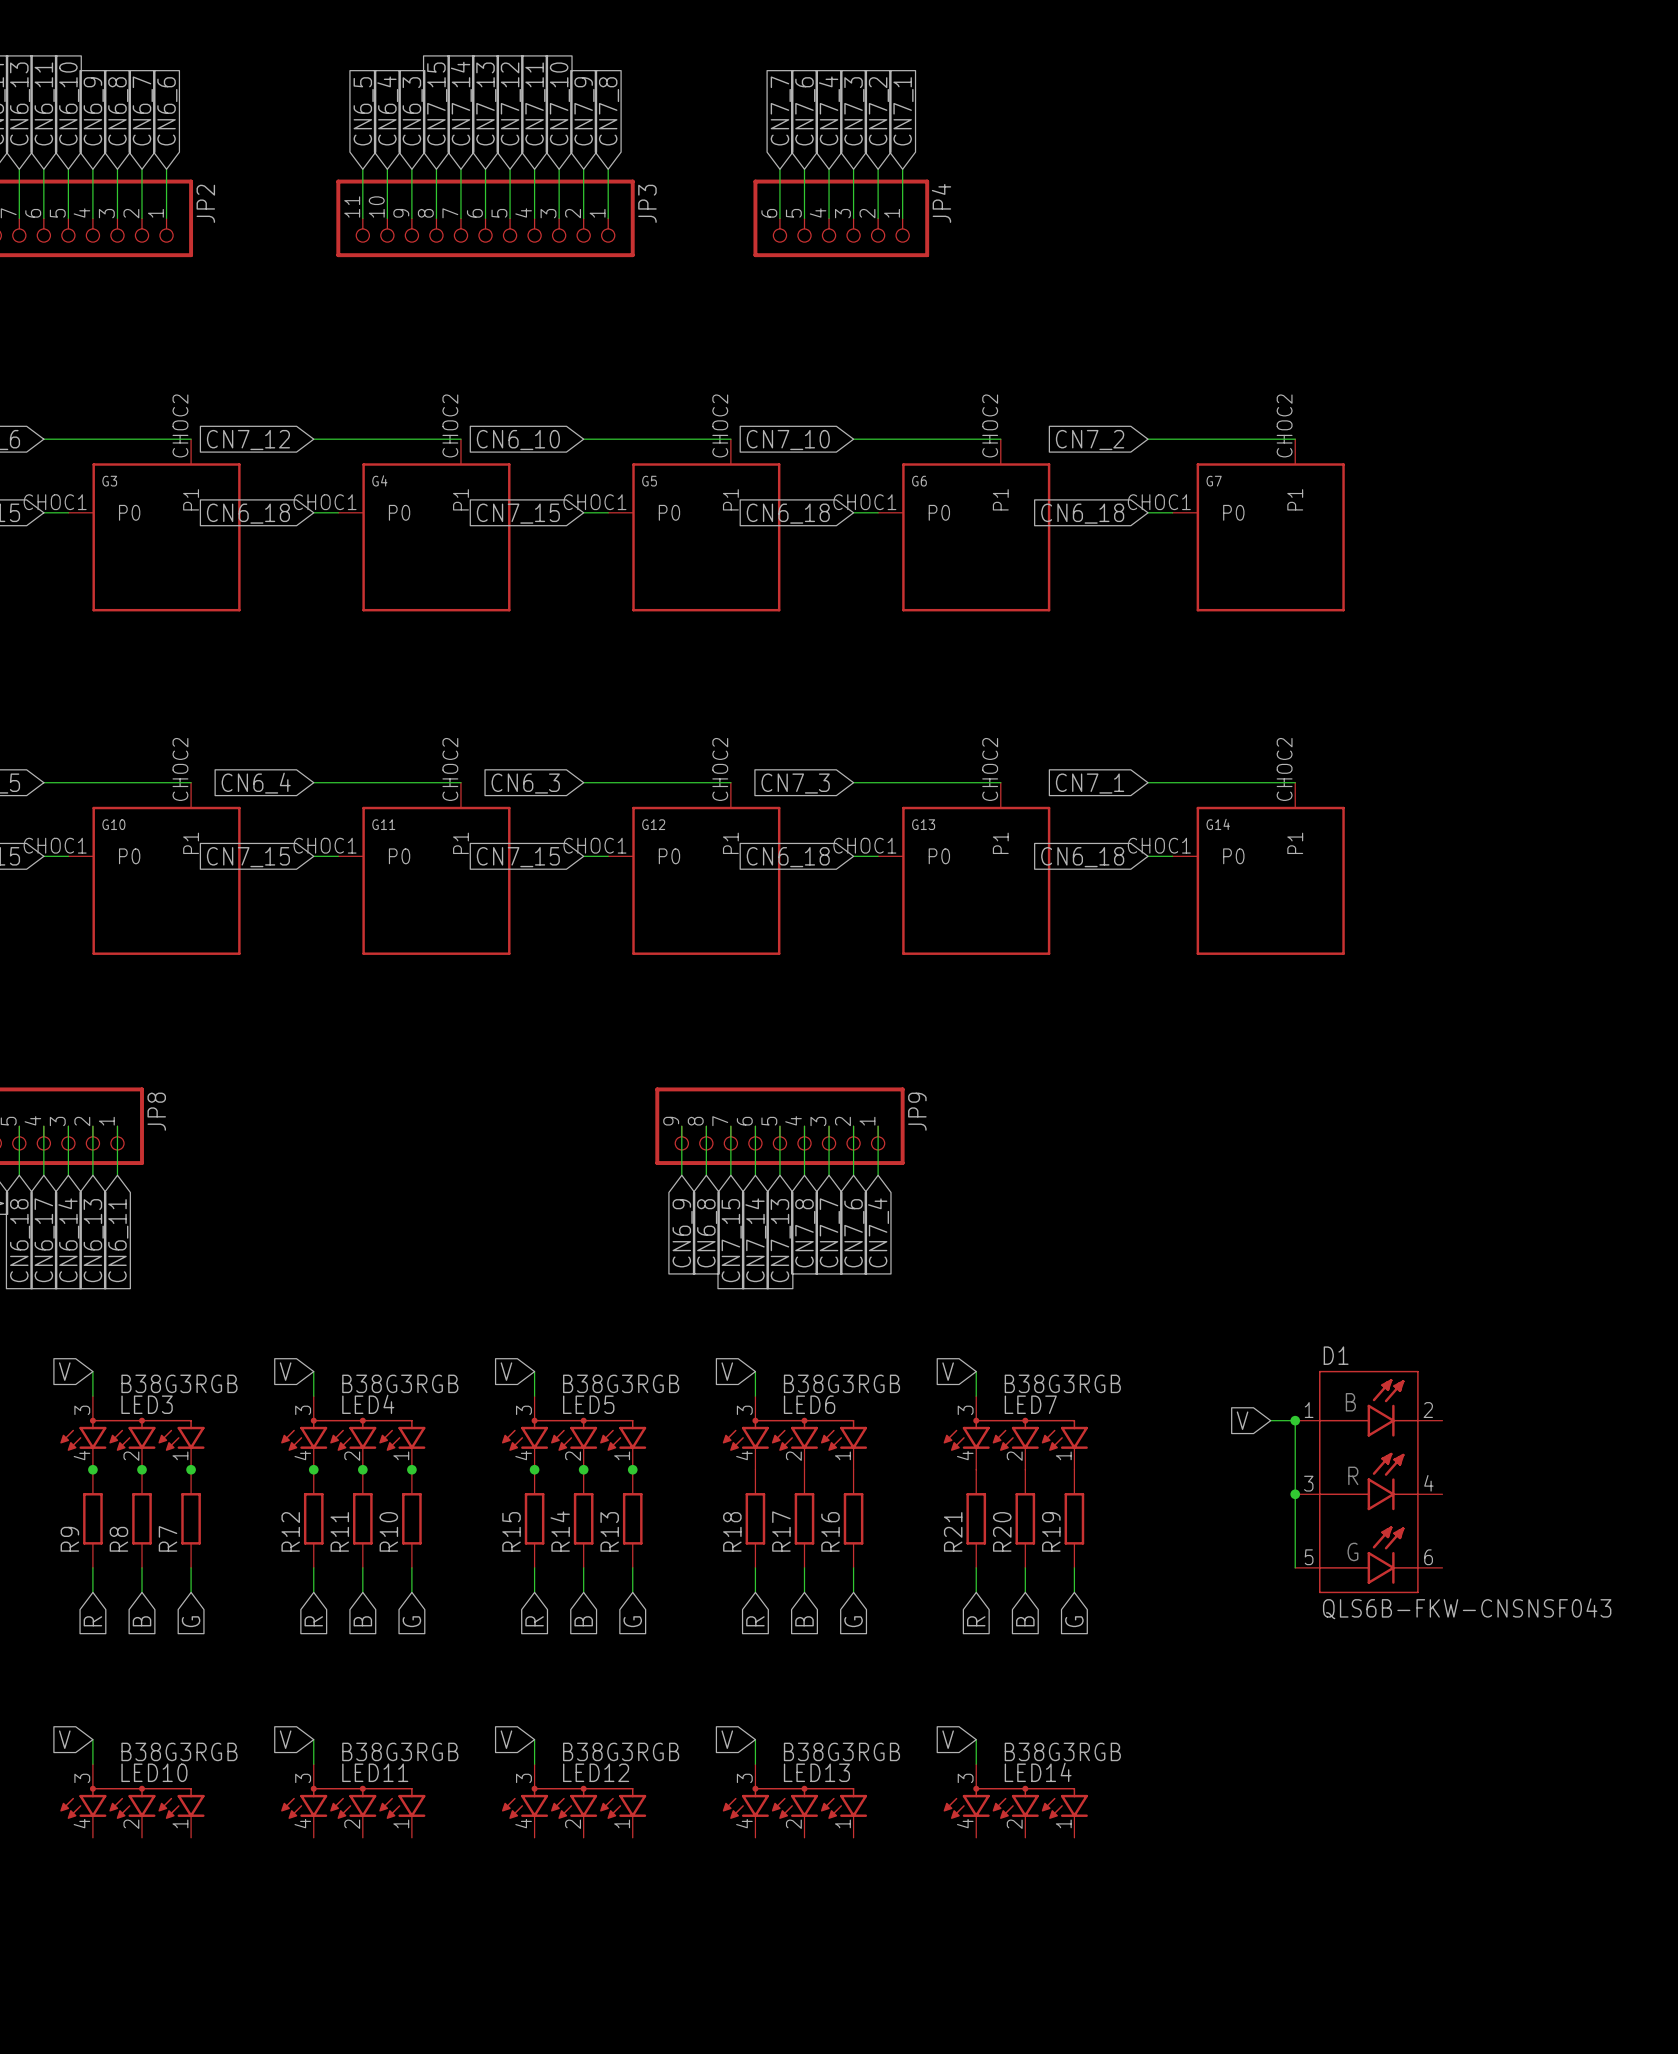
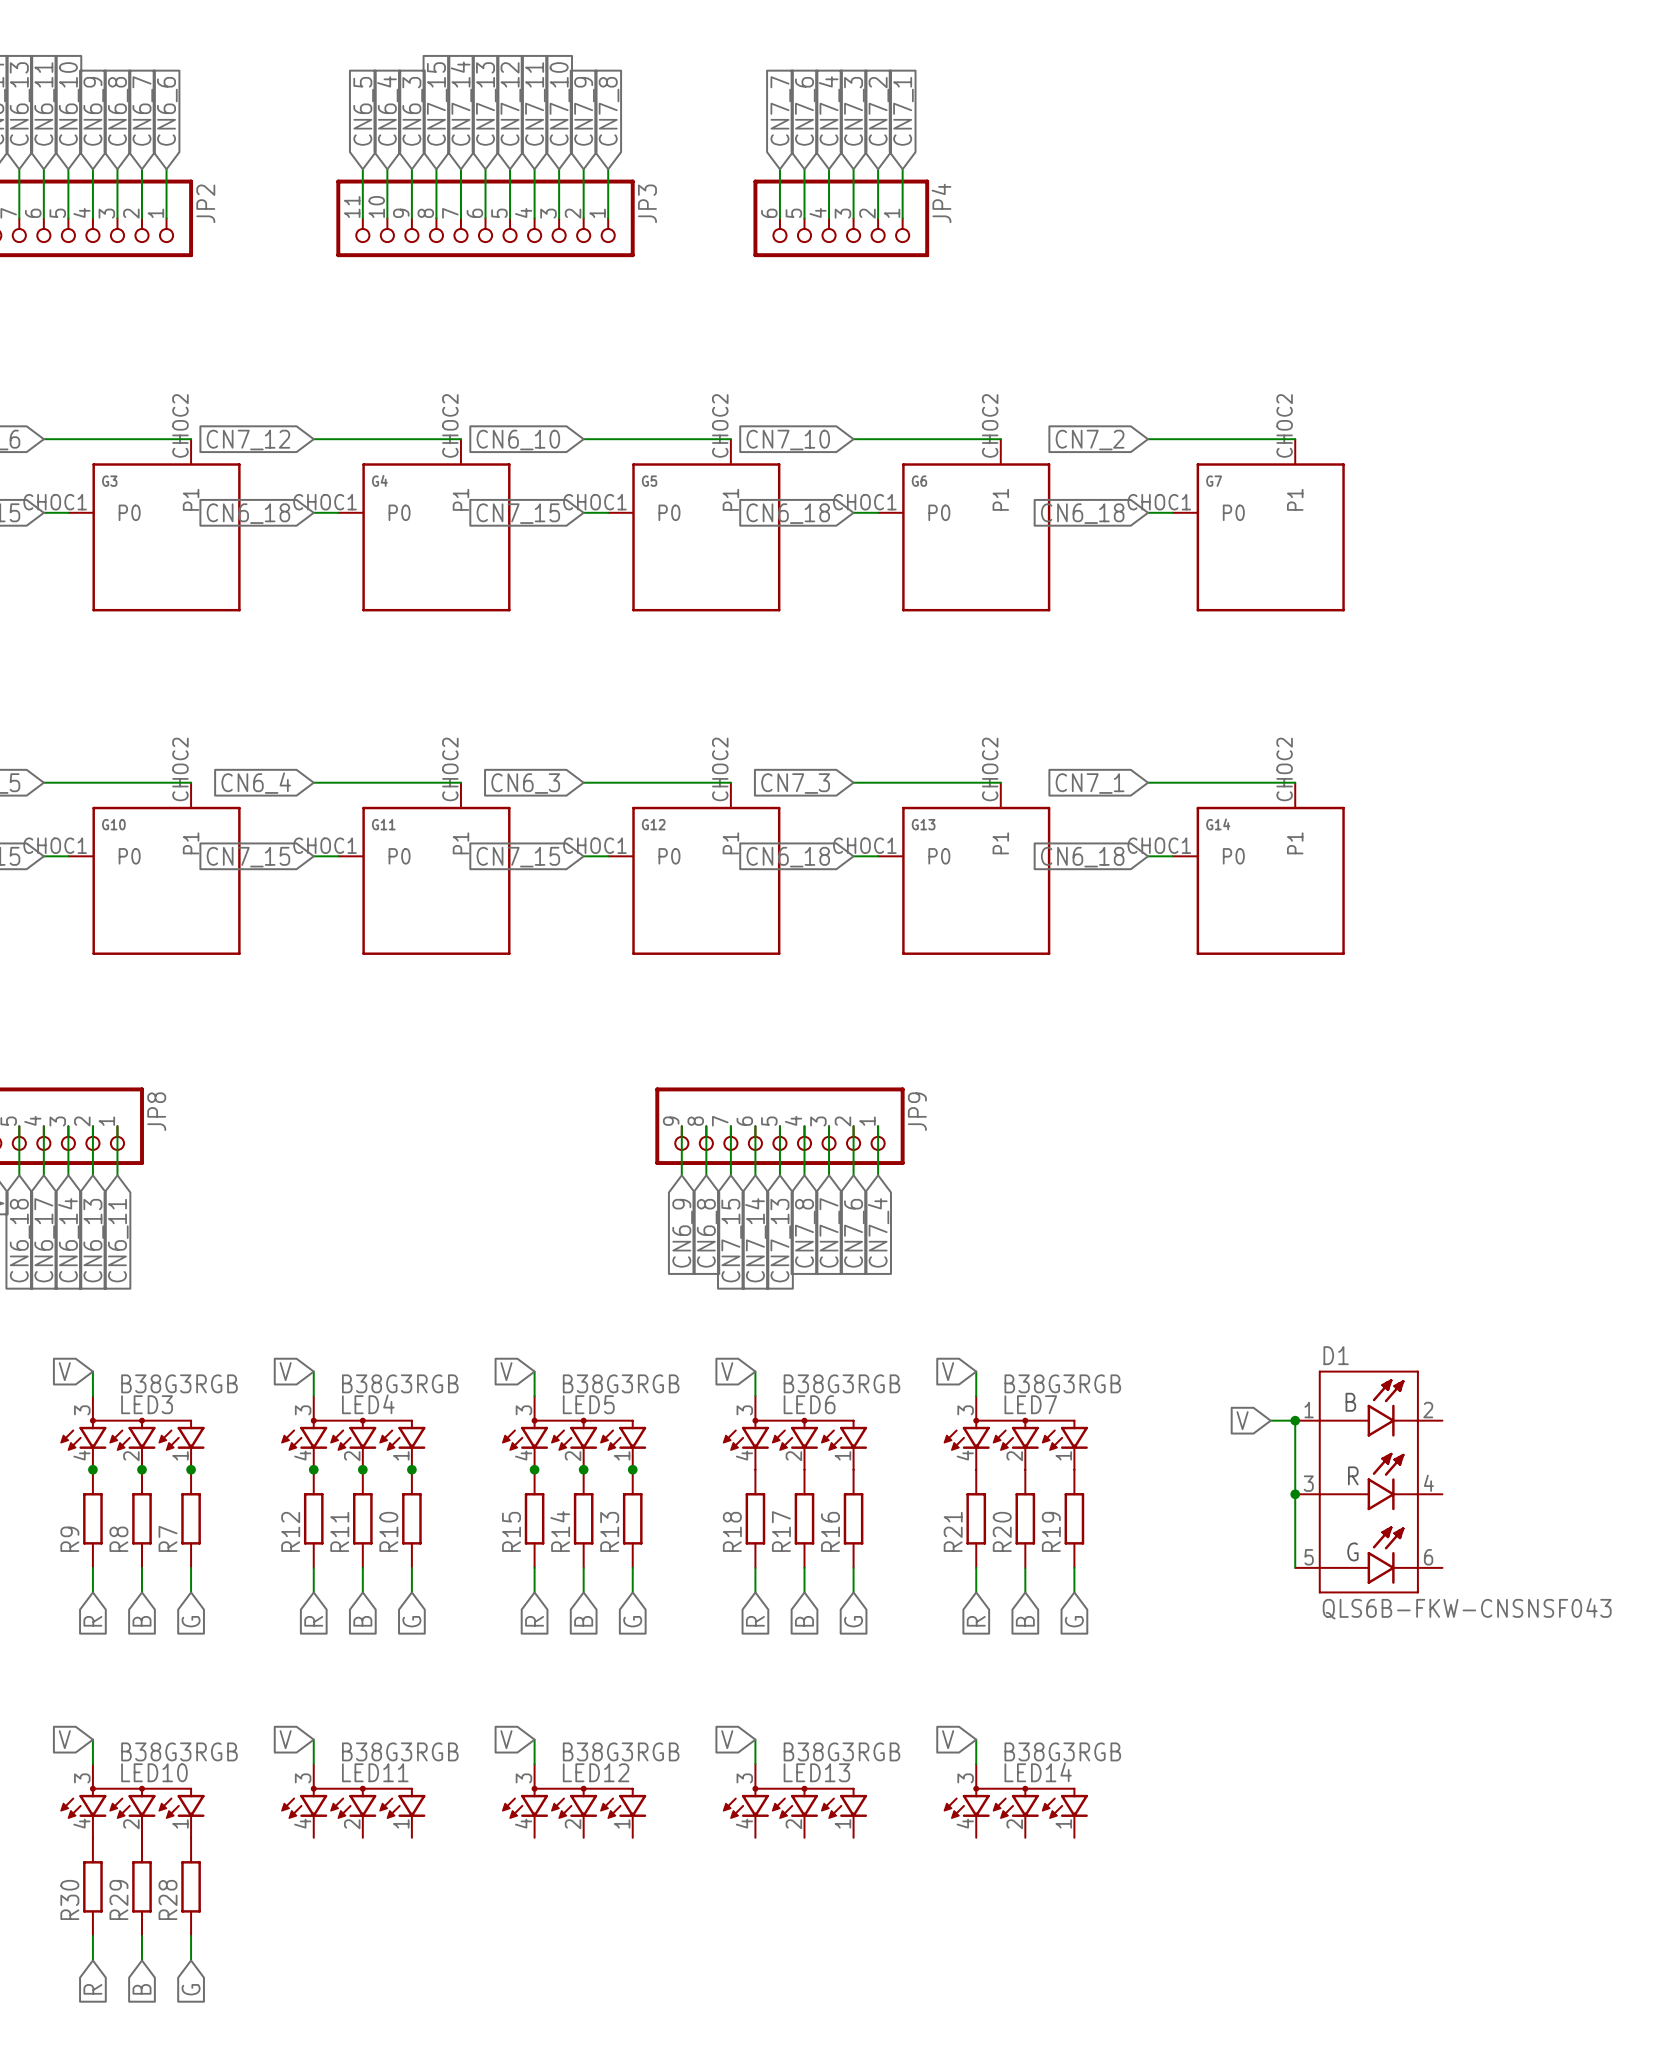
R30: none -> (92, 1886)
R29: none -> (142, 1886)
R28: none -> (191, 1886)
wire: none -> (92, 1935) (92, 1960)
wire: none -> (142, 1935) (142, 1960)
wire: none -> (191, 1935) (191, 1960)
global label: none -> R (92, 1989)
global label: none -> B (142, 1989)
global label: none -> G (191, 1989)

